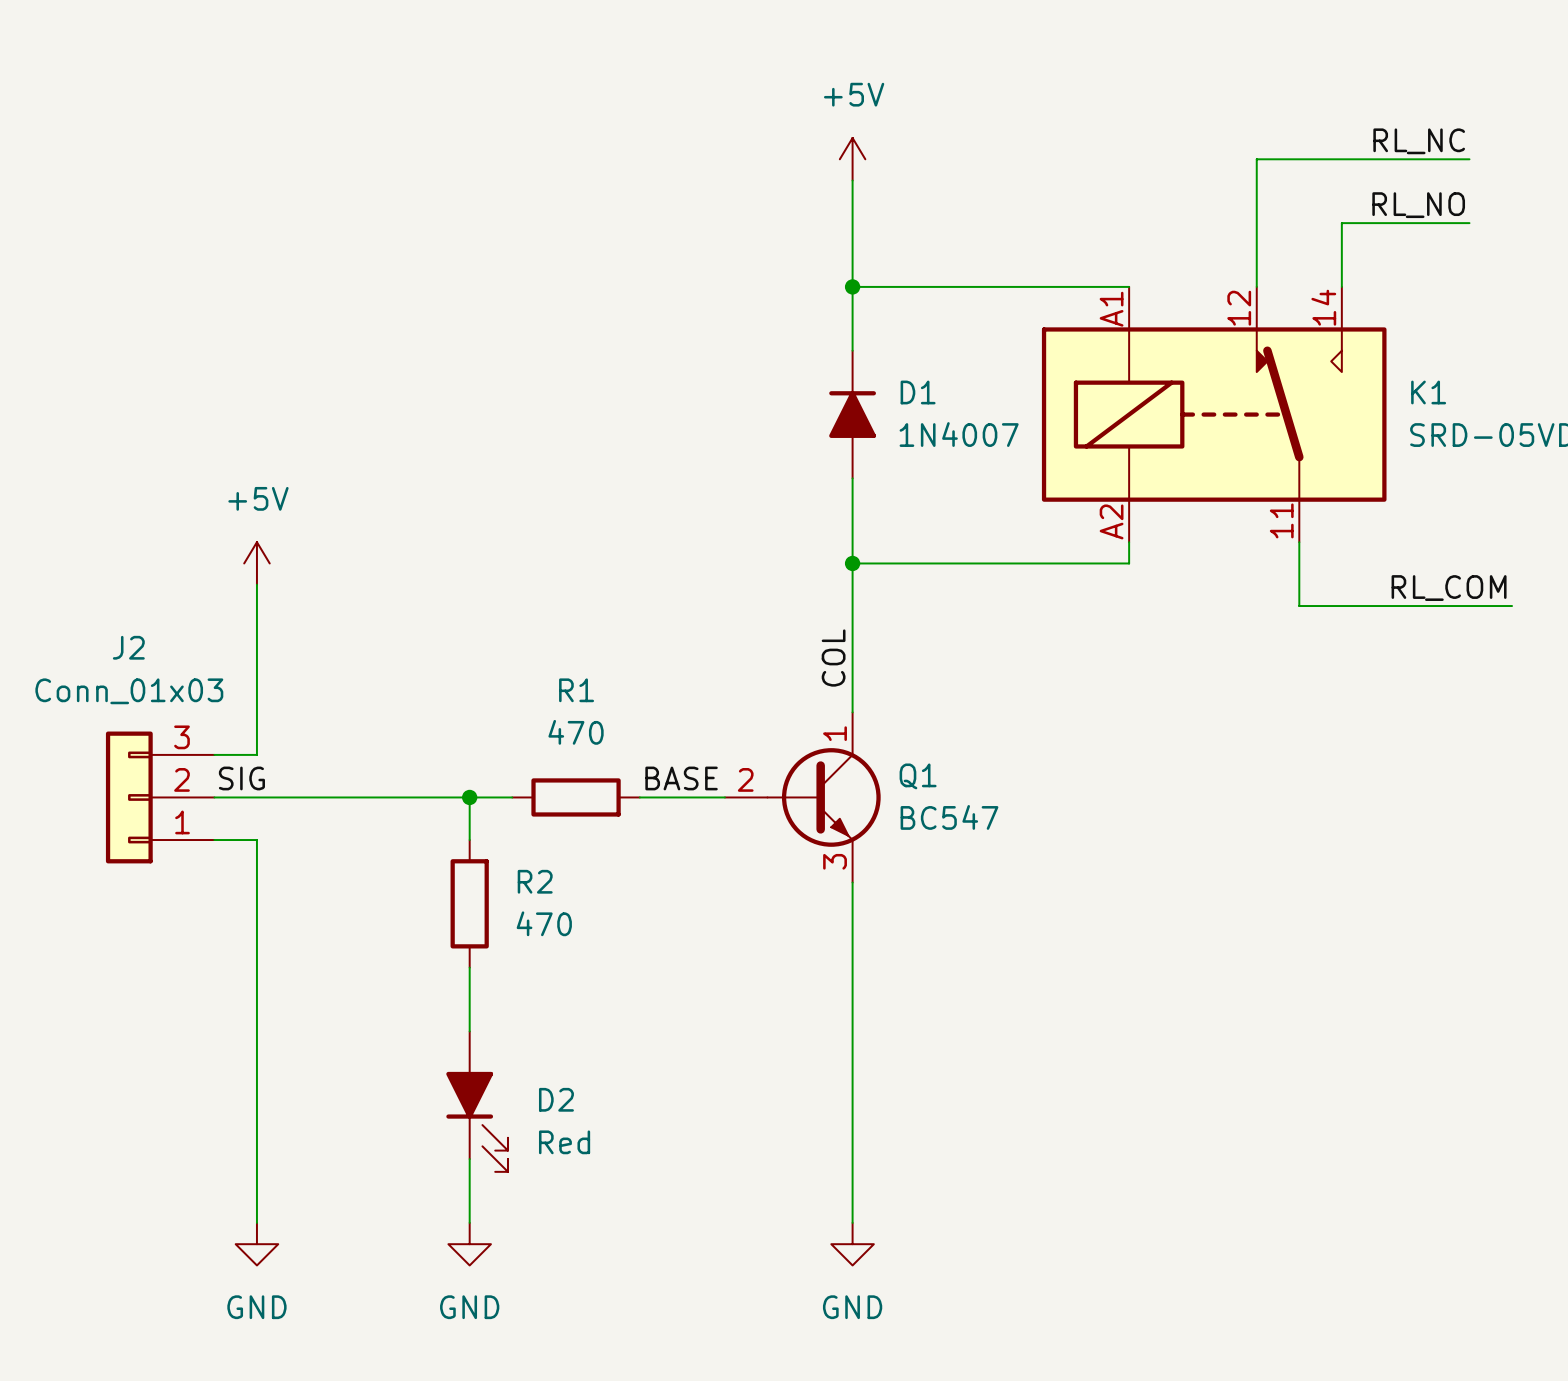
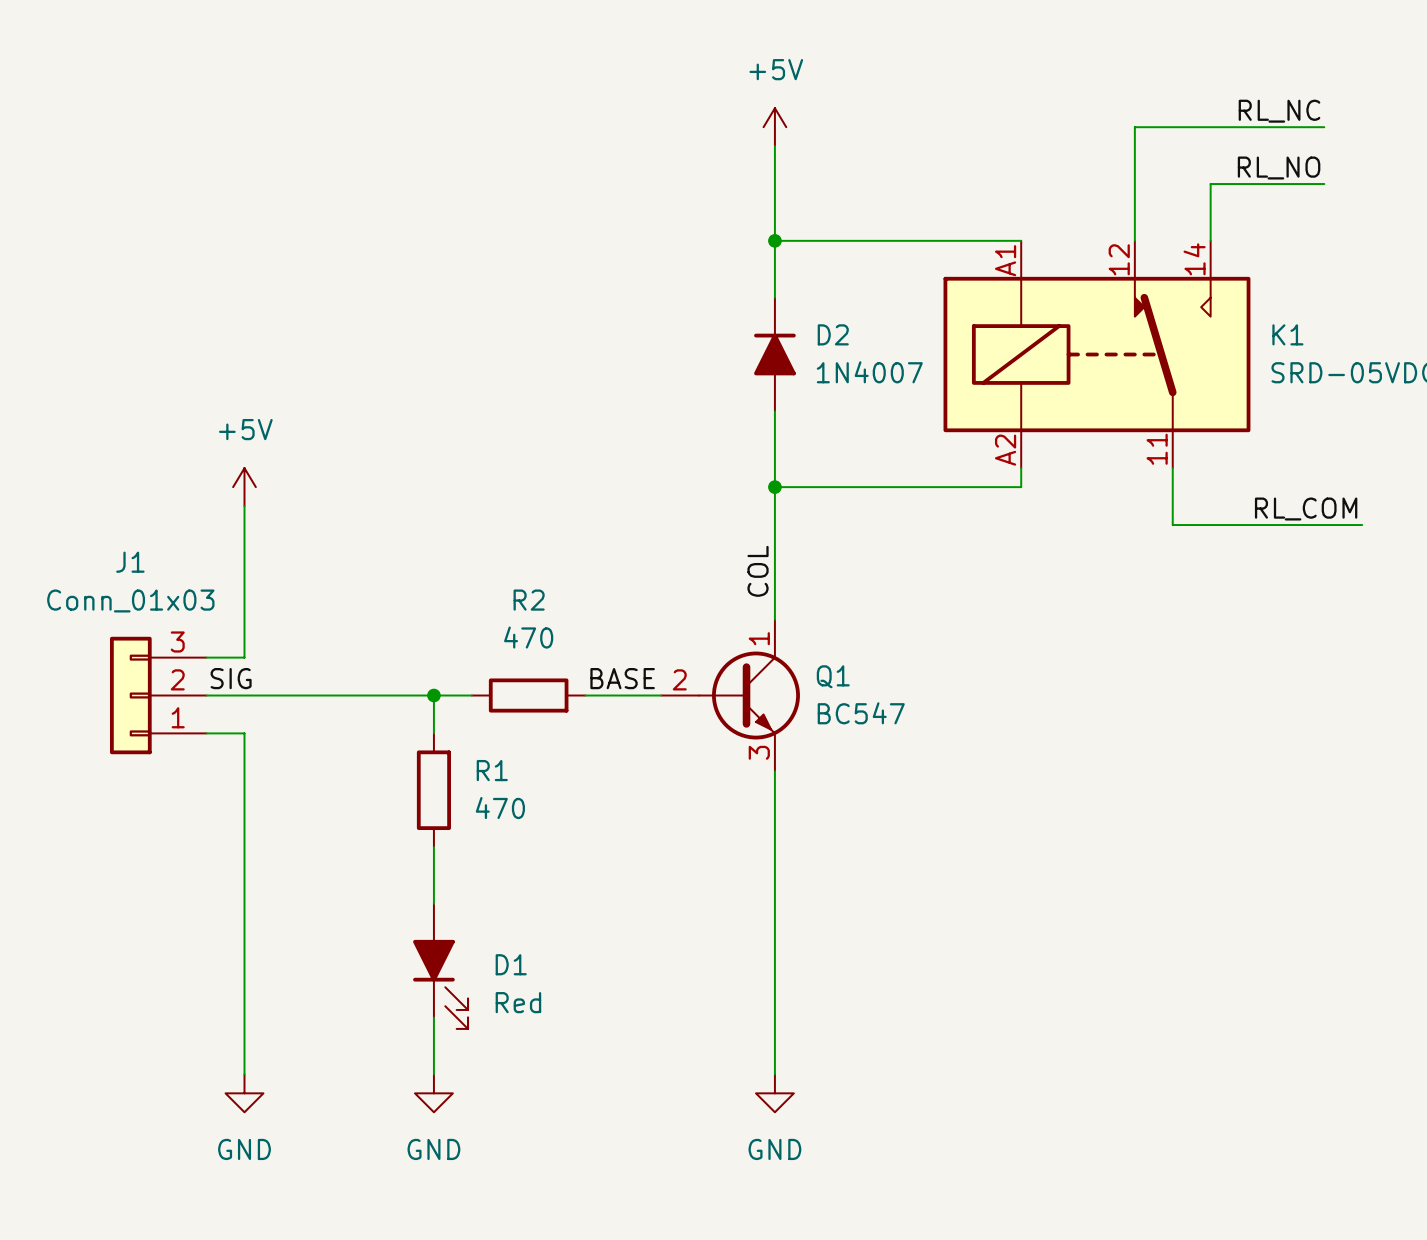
D1 name: D1 (918, 392) -> D2 (833, 334)
J2 name: J2 (128, 647) -> J1 (130, 562)
R1 name: R1 (576, 690) -> R2 (529, 600)
R2 name: R2 (535, 881) -> R1 (492, 770)
D2 name: D2 (556, 1099) -> D1 (511, 964)

